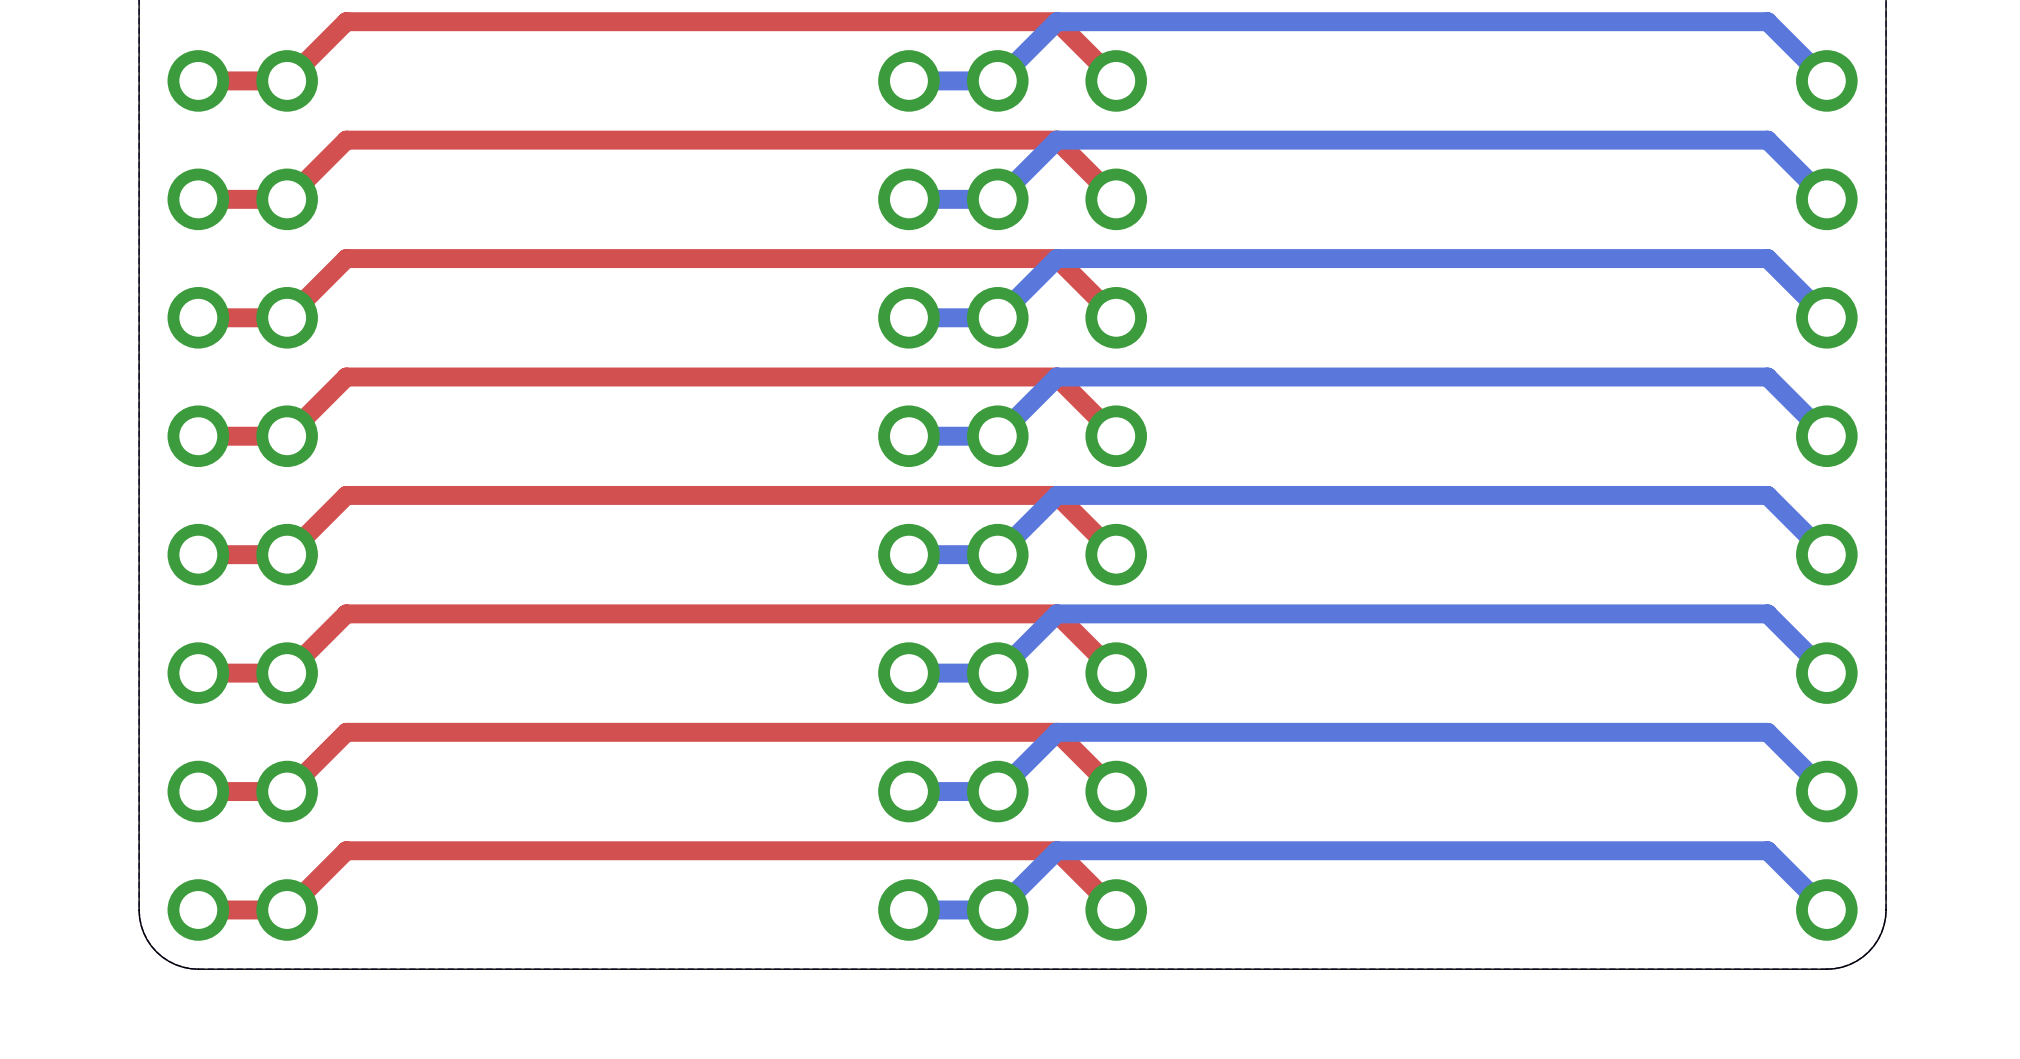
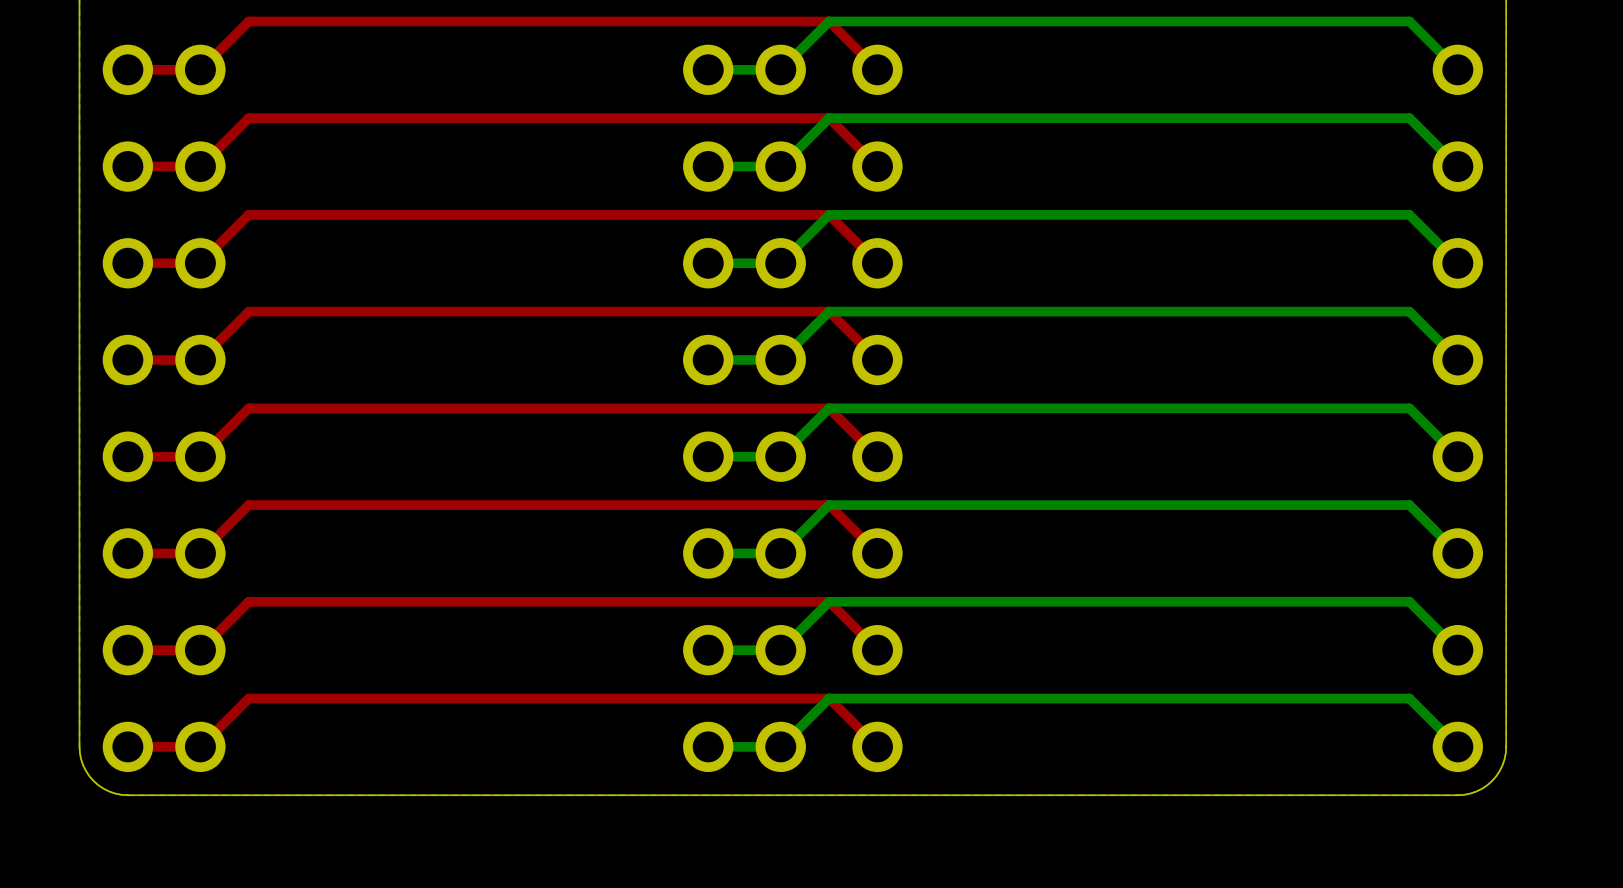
top track width: thick (1116, 80) (1056, 21) (346, 21) (287, 80) (198, 80) -> thin (877, 69) (829, 21) (248, 21) (200, 69) (127, 69)
bottom track width: thick (1826, 80) (1767, 21) (1056, 21) (997, 80) (908, 80) -> thin (1457, 69) (1409, 21) (829, 21) (780, 69) (708, 69)
top track width: thick (1116, 199) (1056, 140) (346, 140) (287, 199) (198, 199) -> thin (877, 166) (829, 118) (248, 118) (200, 166) (127, 166)
bottom track width: thick (1826, 199) (1767, 140) (1056, 140) (997, 199) (908, 199) -> thin (1457, 166) (1409, 118) (829, 118) (780, 166) (708, 166)
top track width: thick (1116, 317) (1056, 258) (346, 258) (287, 317) (198, 317) -> thin (877, 263) (829, 214) (248, 214) (200, 263) (127, 263)
bottom track width: thick (1826, 317) (1767, 258) (1056, 258) (997, 317) (908, 317) -> thin (1457, 263) (1409, 214) (829, 214) (780, 263) (708, 263)
top track width: thick (1116, 436) (1056, 377) (346, 377) (287, 436) (198, 436) -> thin (877, 359) (829, 311) (248, 311) (200, 359) (127, 359)
bottom track width: thick (1826, 436) (1767, 377) (1056, 377) (997, 436) (908, 436) -> thin (1457, 359) (1409, 311) (829, 311) (780, 359) (708, 359)
top track width: thick (1116, 554) (1056, 495) (346, 495) (287, 554) (198, 554) -> thin (877, 456) (829, 408) (248, 408) (200, 456) (127, 456)
bottom track width: thick (1826, 554) (1767, 495) (1056, 495) (997, 554) (908, 554) -> thin (1457, 456) (1409, 408) (829, 408) (780, 456) (708, 456)
top track width: thick (1116, 673) (1056, 613) (346, 613) (287, 673) (198, 673) -> thin (877, 553) (829, 505) (248, 505) (200, 553) (127, 553)
bottom track width: thick (1826, 673) (1767, 613) (1056, 613) (997, 673) (908, 673) -> thin (1457, 553) (1409, 505) (829, 505) (780, 553) (708, 553)
top track width: thick (1116, 791) (1056, 732) (346, 732) (287, 791) (198, 791) -> thin (877, 650) (829, 601) (248, 601) (200, 650) (127, 650)
bottom track width: thick (1826, 791) (1767, 732) (1056, 732) (997, 791) (908, 791) -> thin (1457, 650) (1409, 601) (829, 601) (780, 650) (708, 650)
top track width: thick (1116, 909) (1056, 850) (346, 850) (287, 909) (198, 909) -> thin (877, 746) (829, 698) (248, 698) (200, 746) (127, 746)
bottom track width: thick (1826, 909) (1767, 850) (1056, 850) (997, 909) (908, 909) -> thin (1457, 746) (1409, 698) (829, 698) (780, 746) (708, 746)

